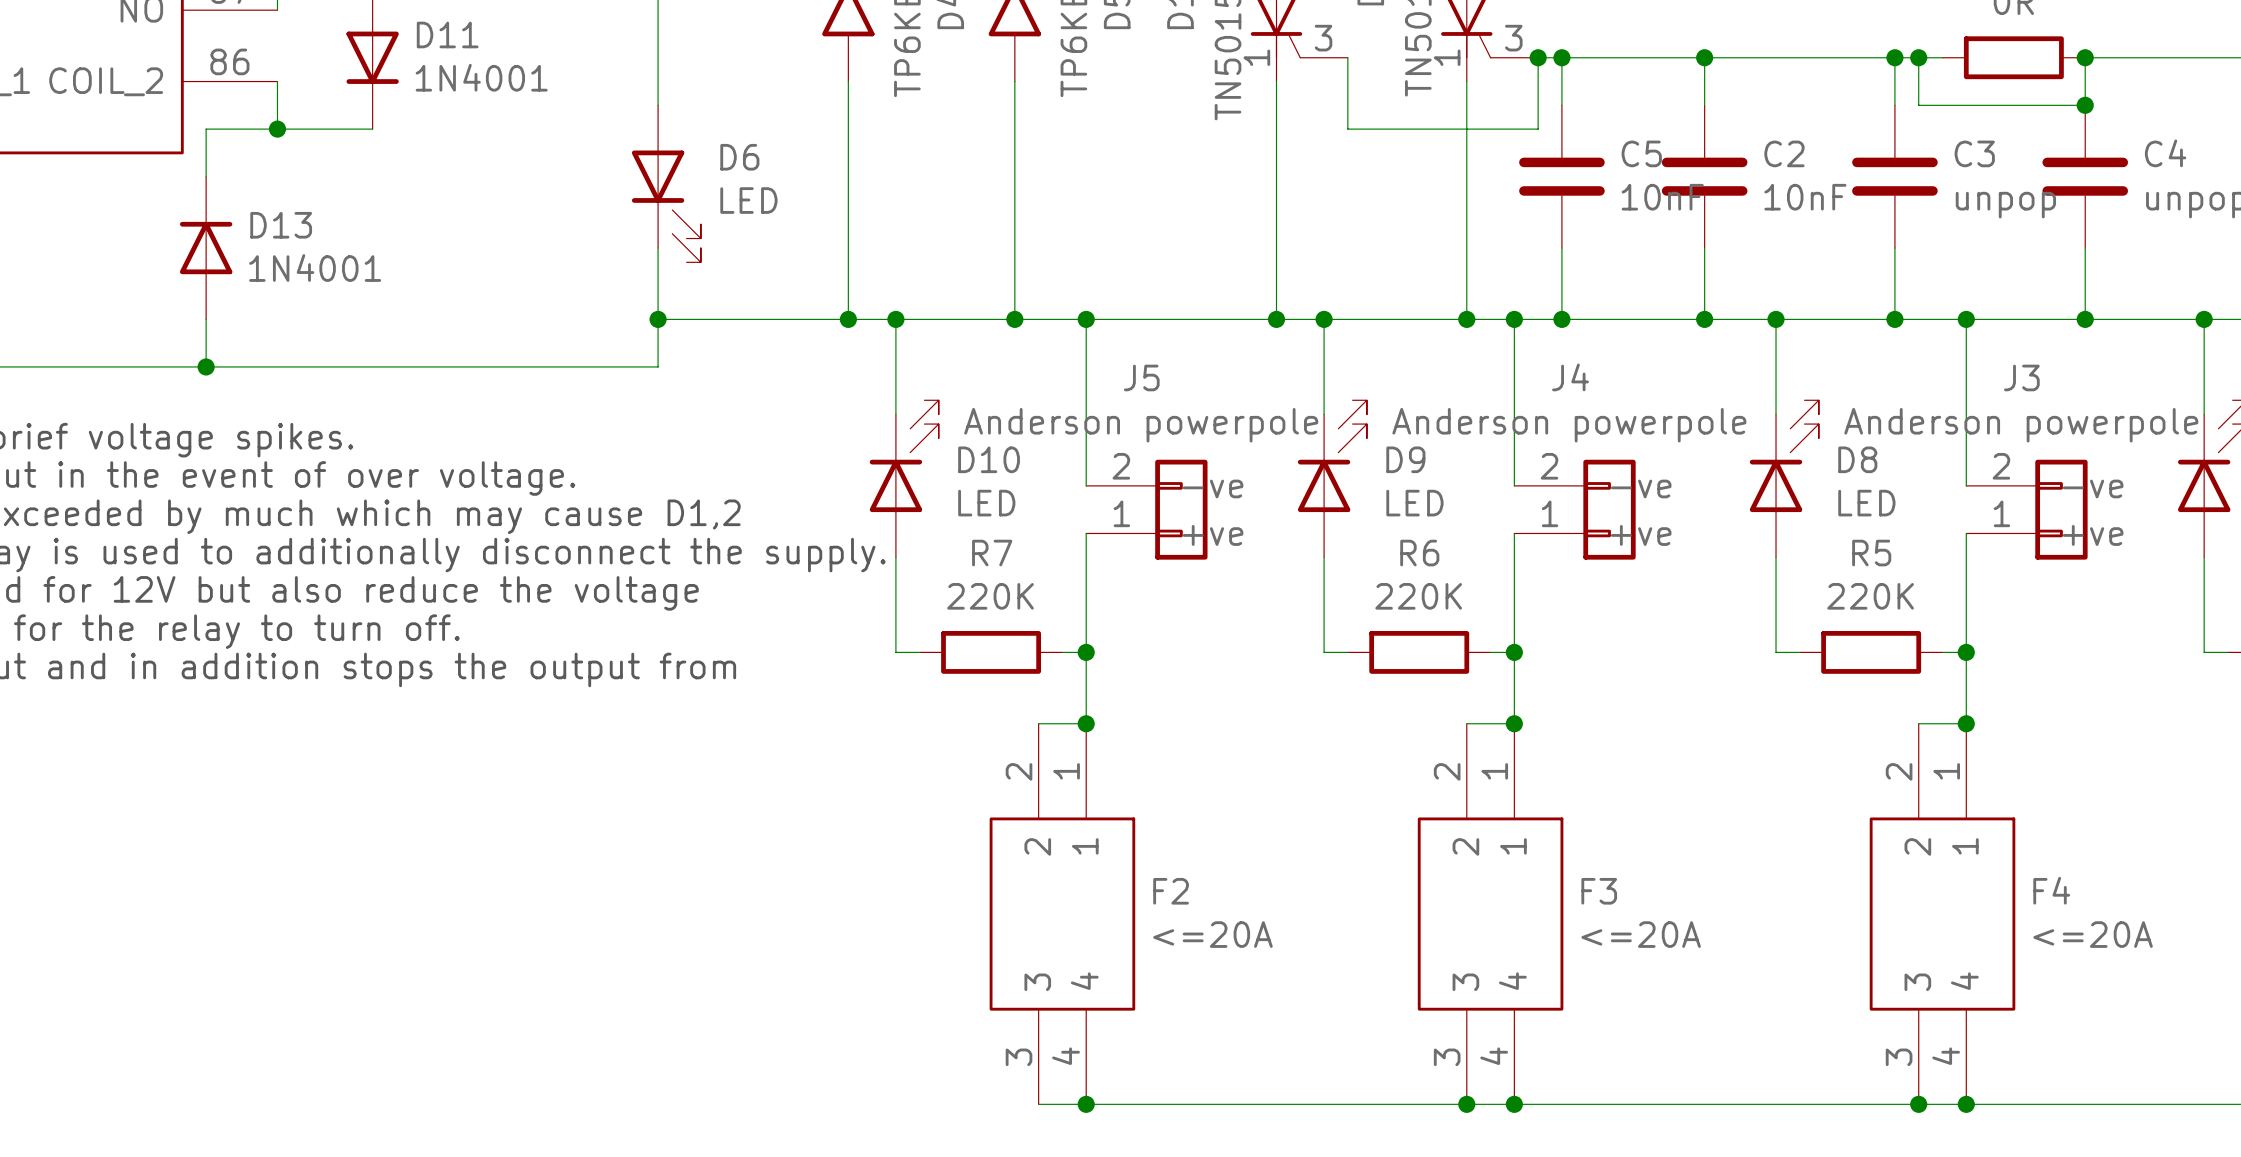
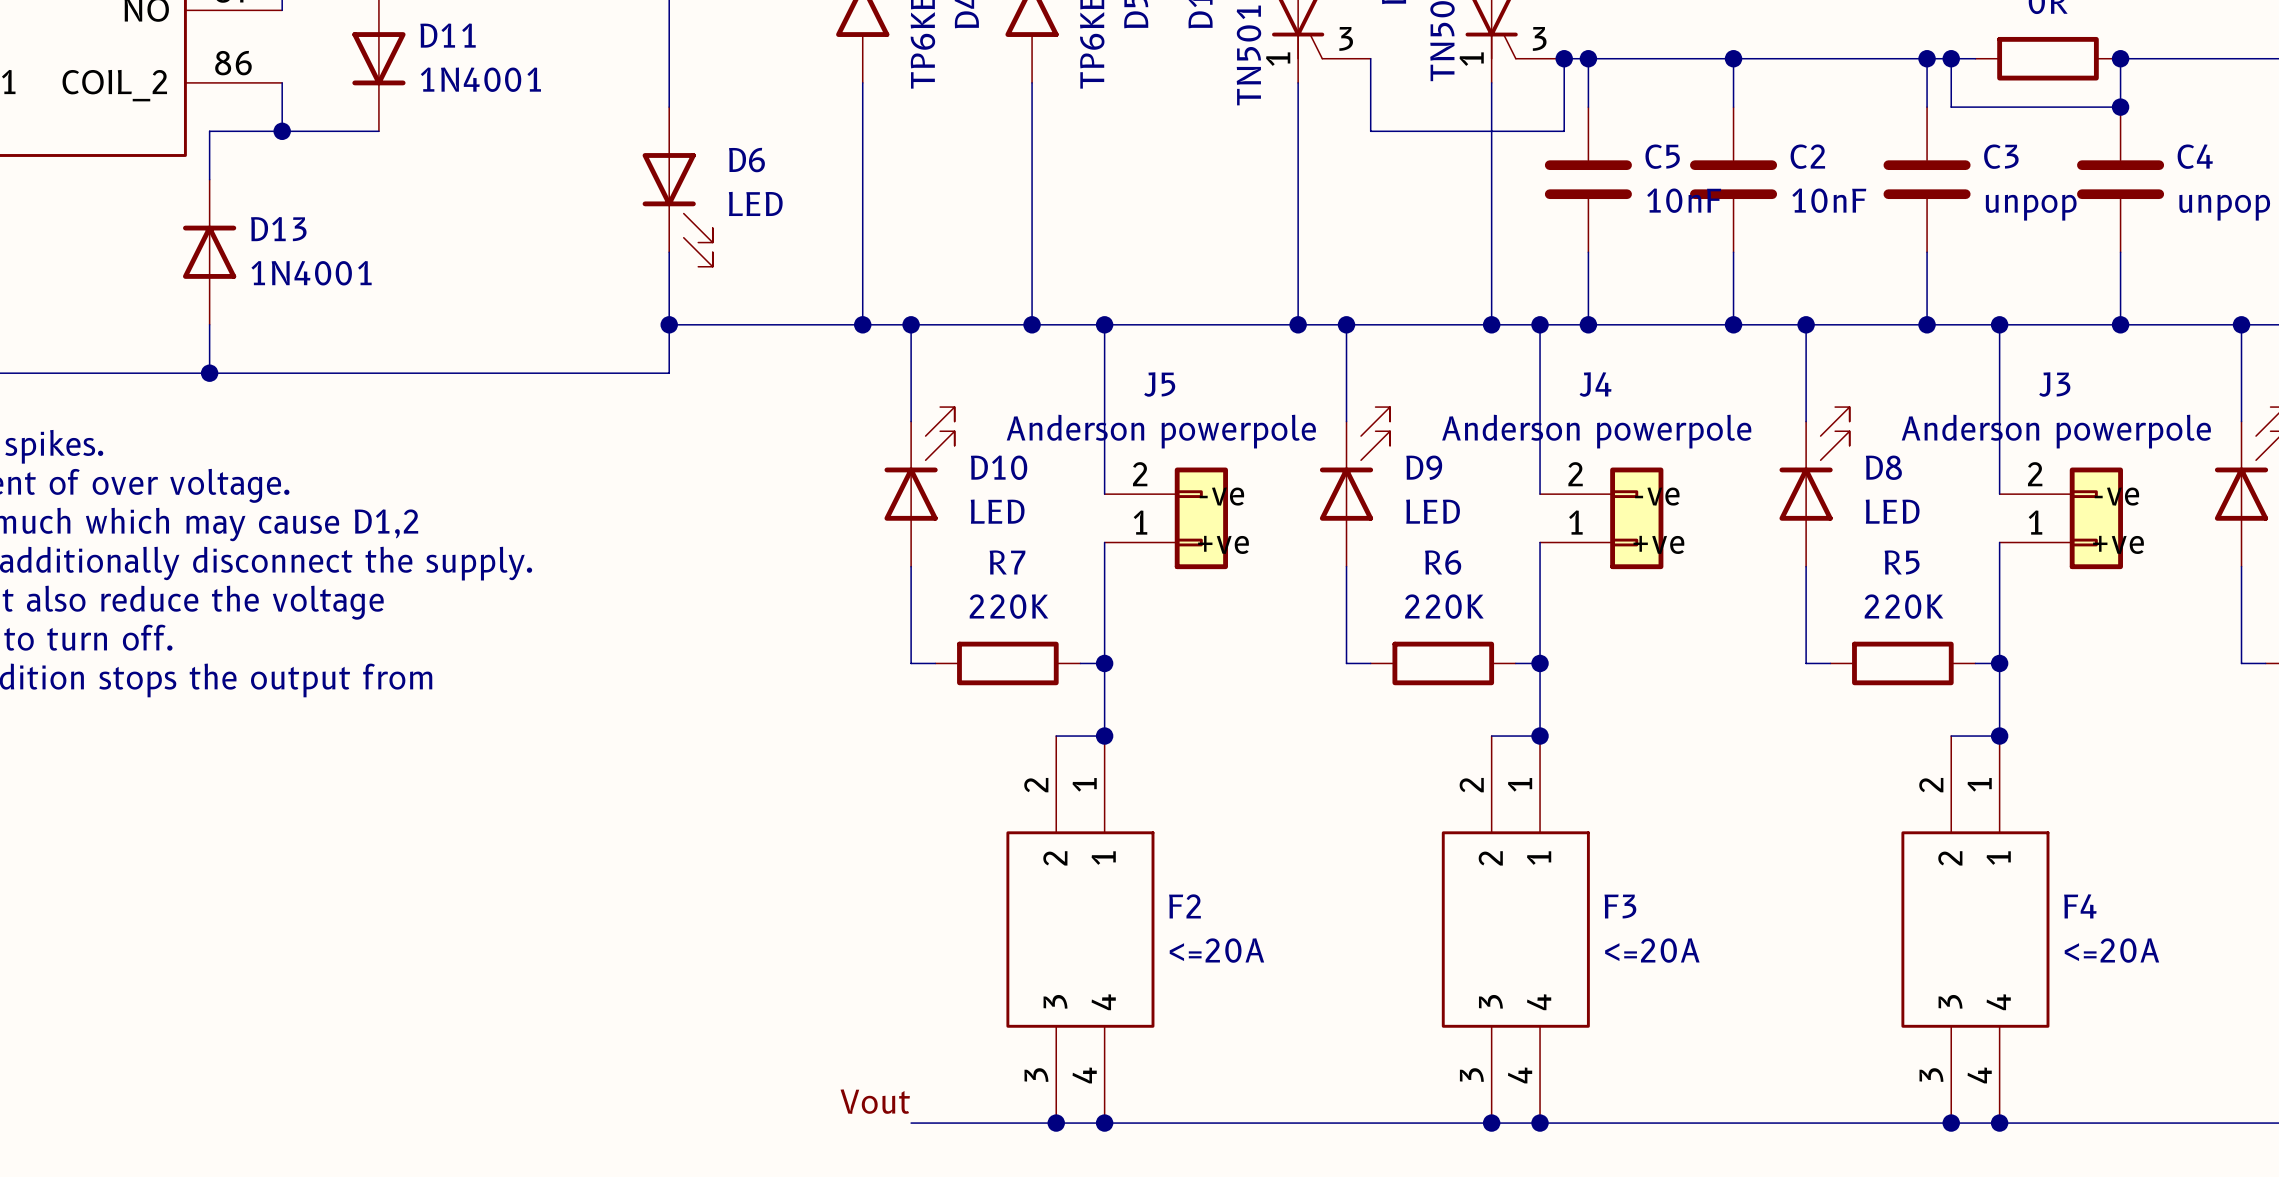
label: none -> Vout (875, 1101)
wire: none -> (911, 1123) (1056, 1123)
junction: none -> (1056, 1123)

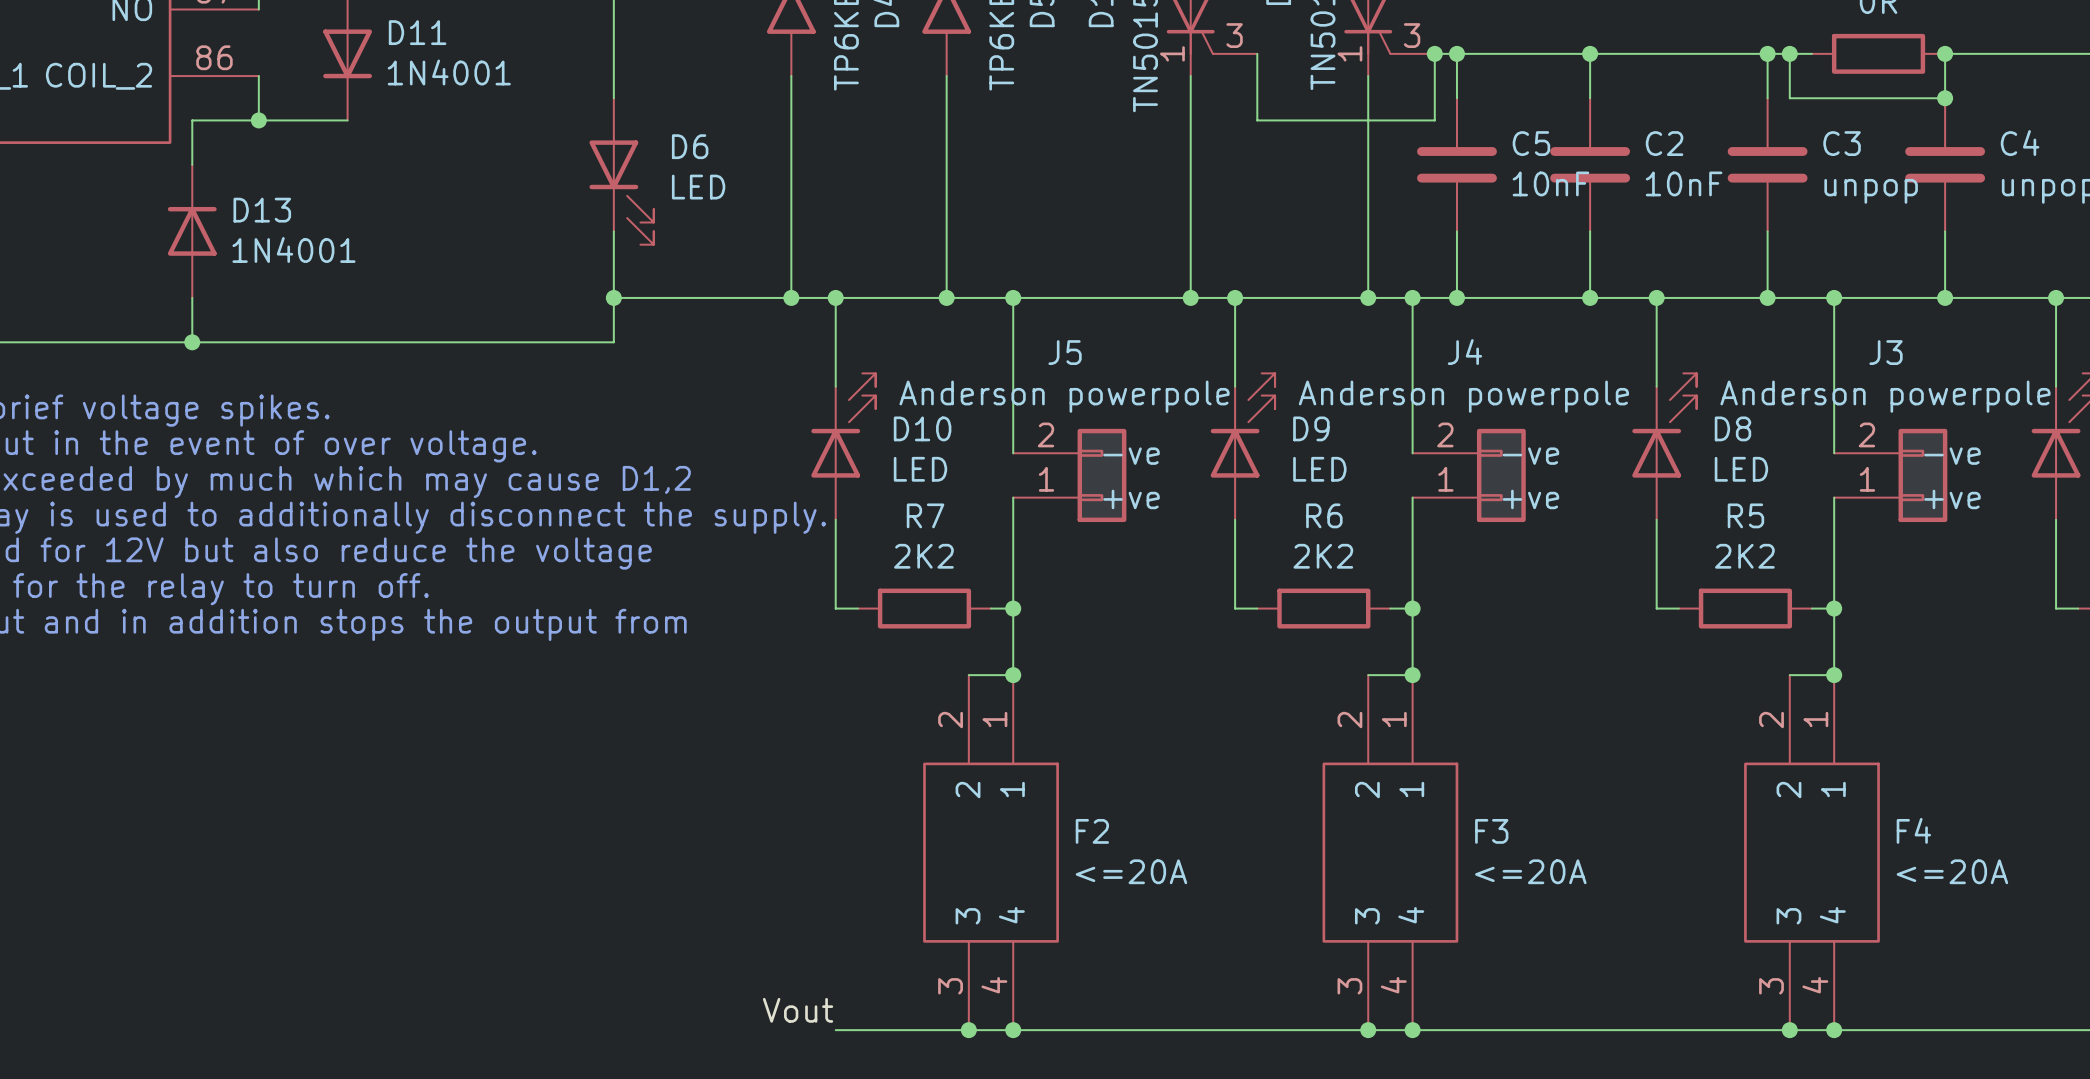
R7 value: 220K (1008, 606) -> 2K2 (923, 556)
R6 value: 220K (1444, 606) -> 2K2 (1323, 556)
R5 value: 220K (1903, 606) -> 2K2 (1744, 556)

